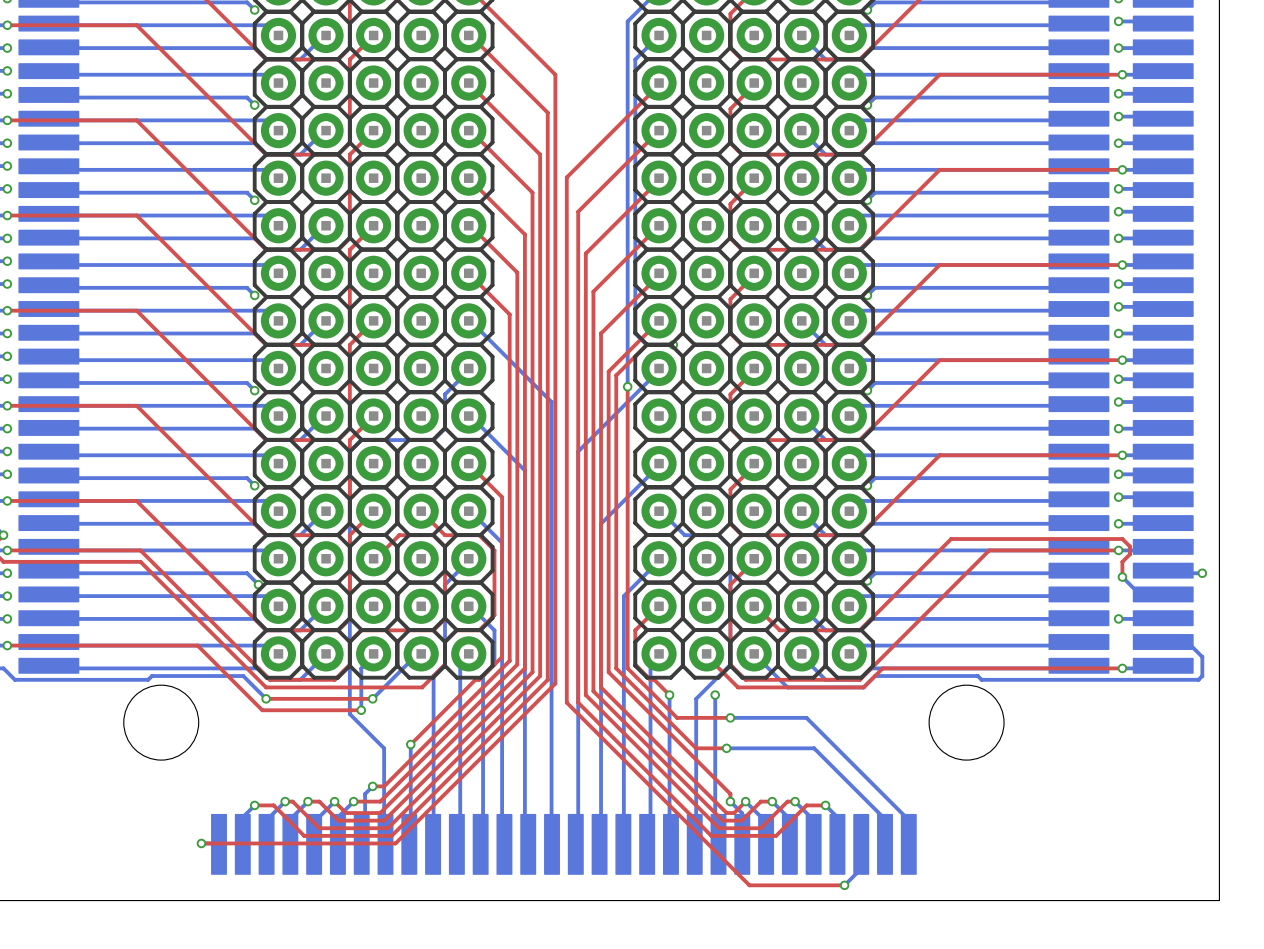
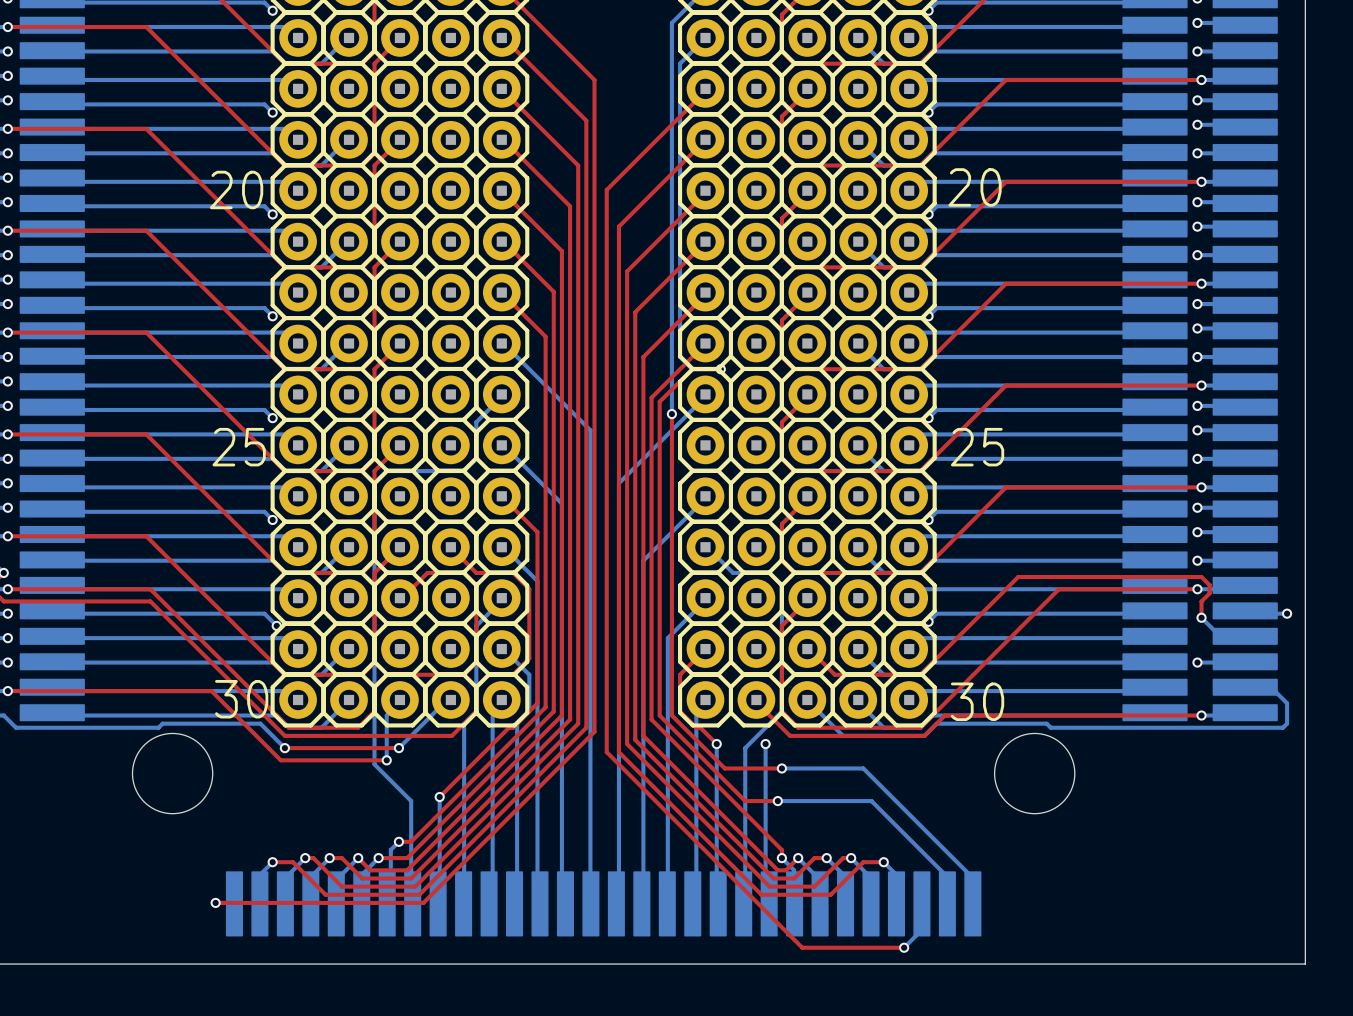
text: none -> 20 (975, 187)
text: none -> 20 (236, 189)
text: none -> 25 (239, 447)
text: none -> 25 (977, 447)
text: none -> 30 (241, 699)
text: none -> 30 (977, 701)

